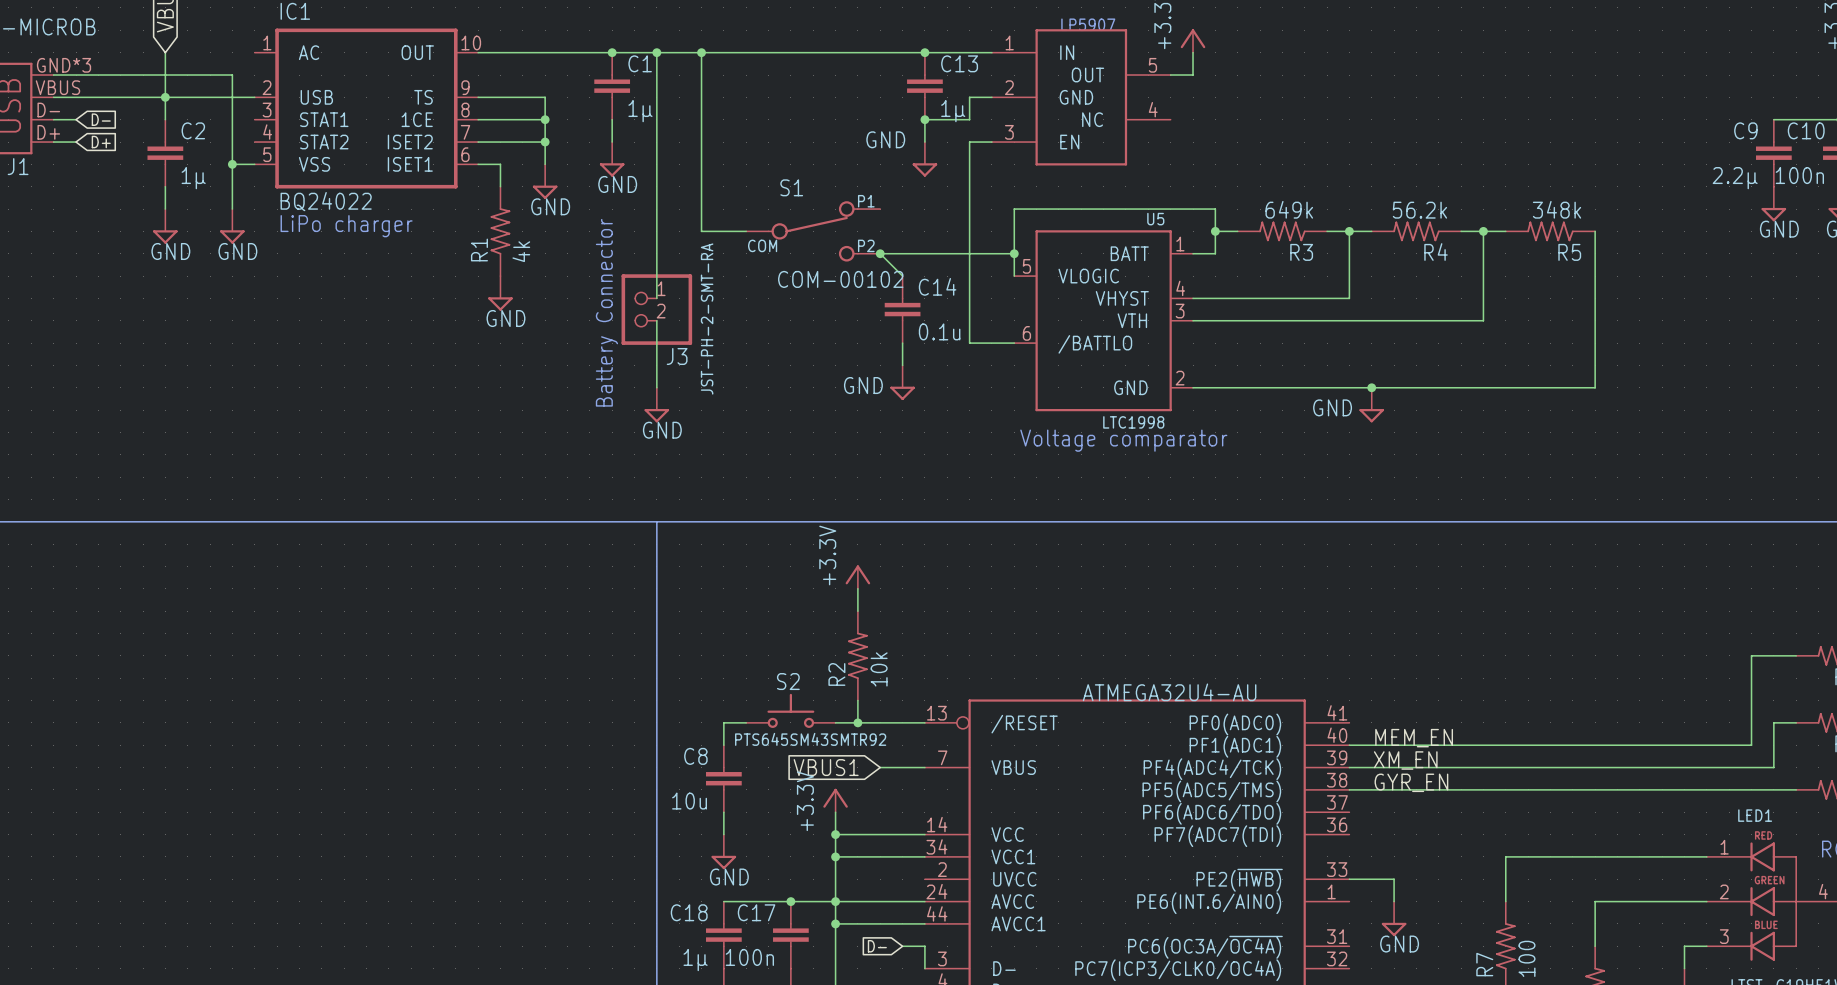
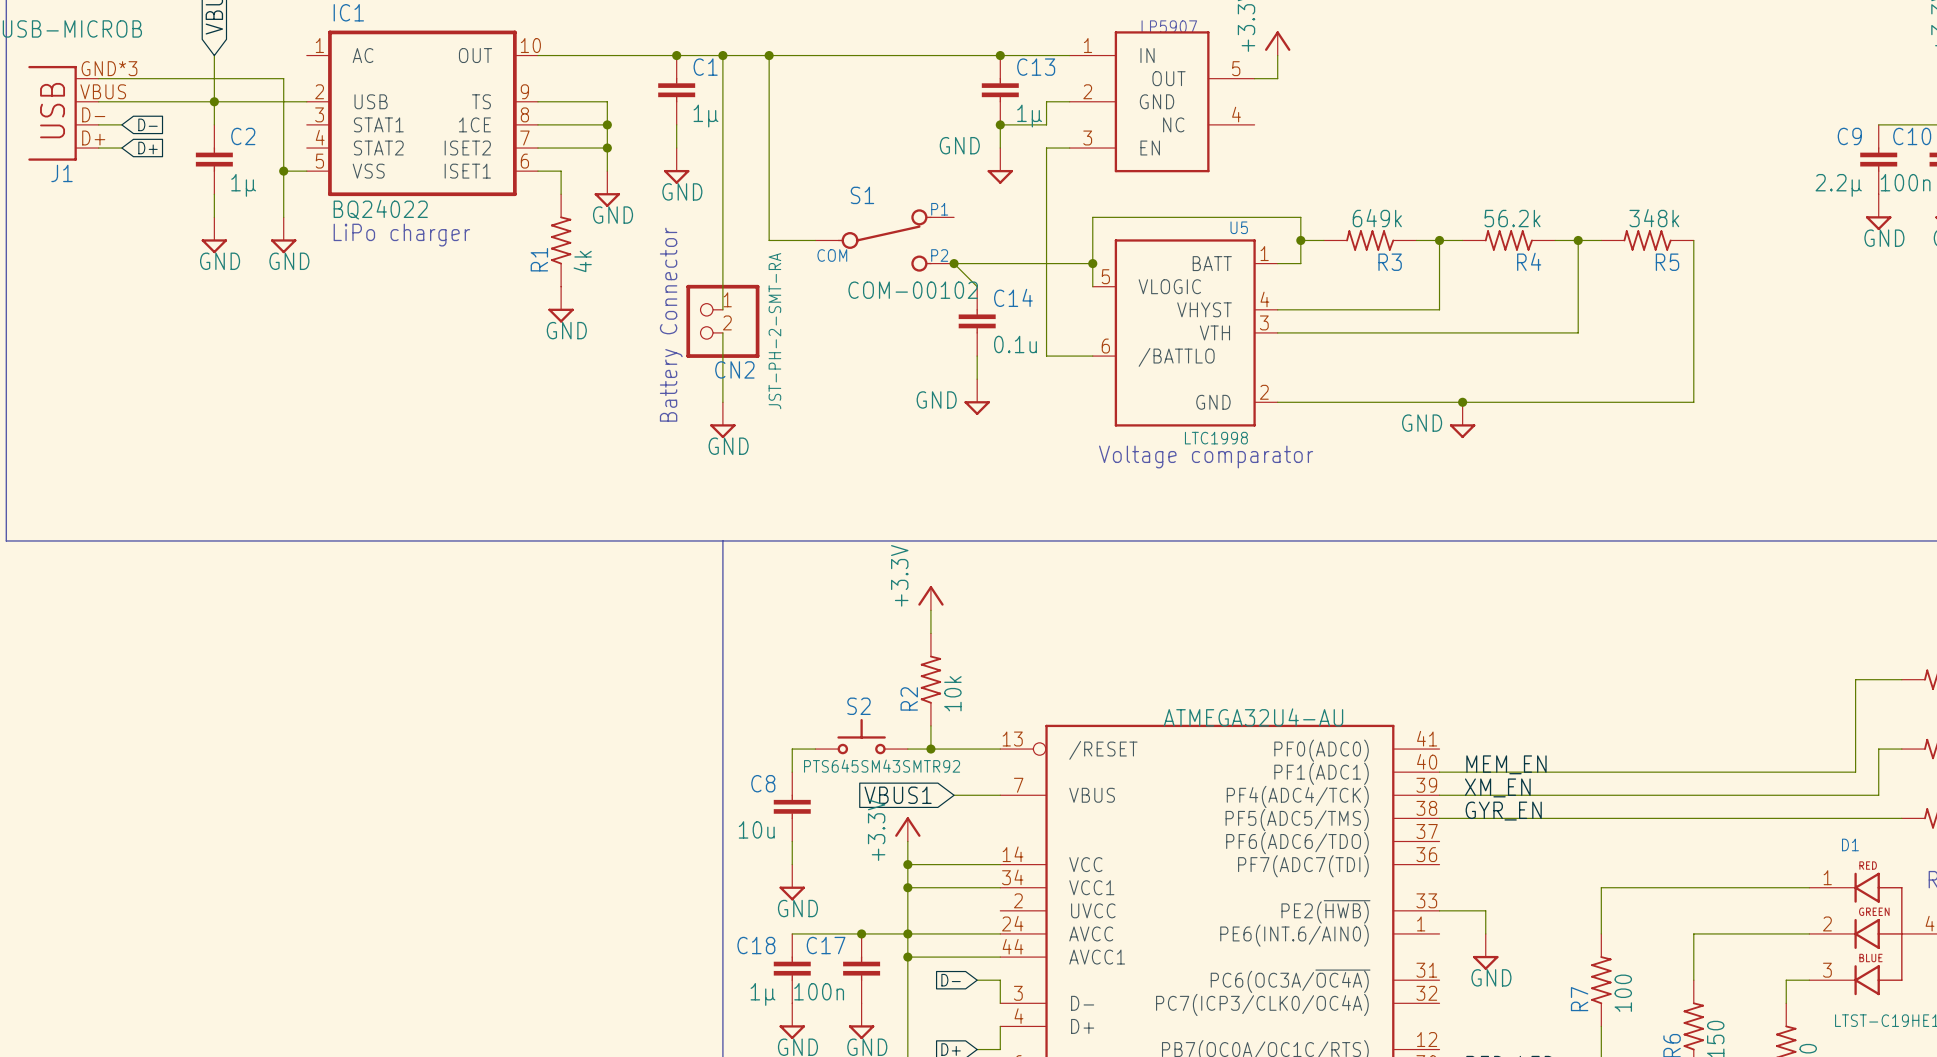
J3 name: J3 (677, 356) -> CN2 (734, 369)
LED1 name: LED1 (1755, 815) -> D1 (1850, 844)

